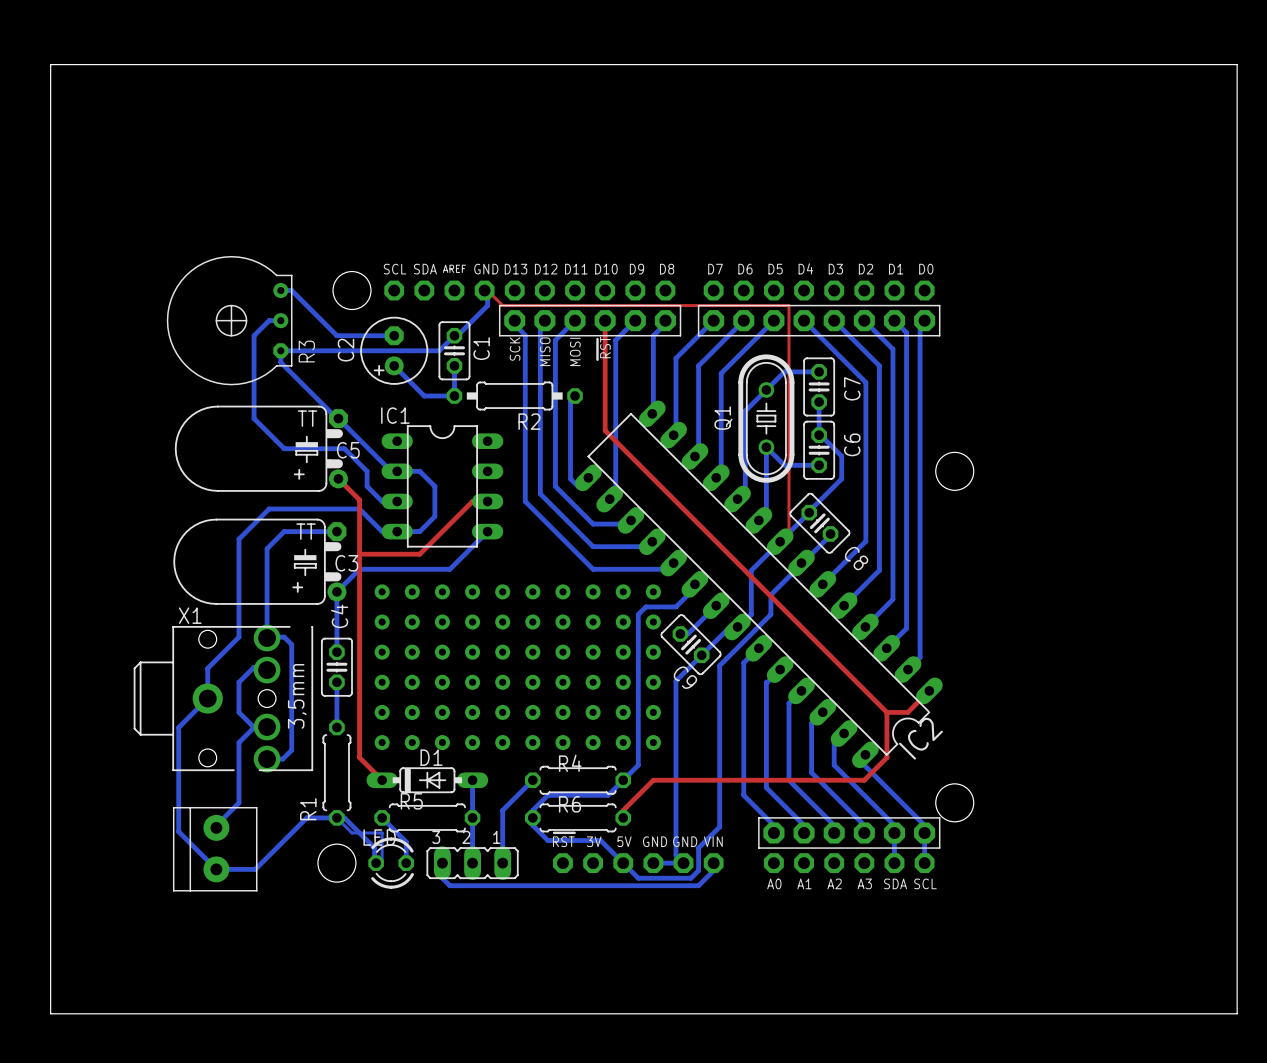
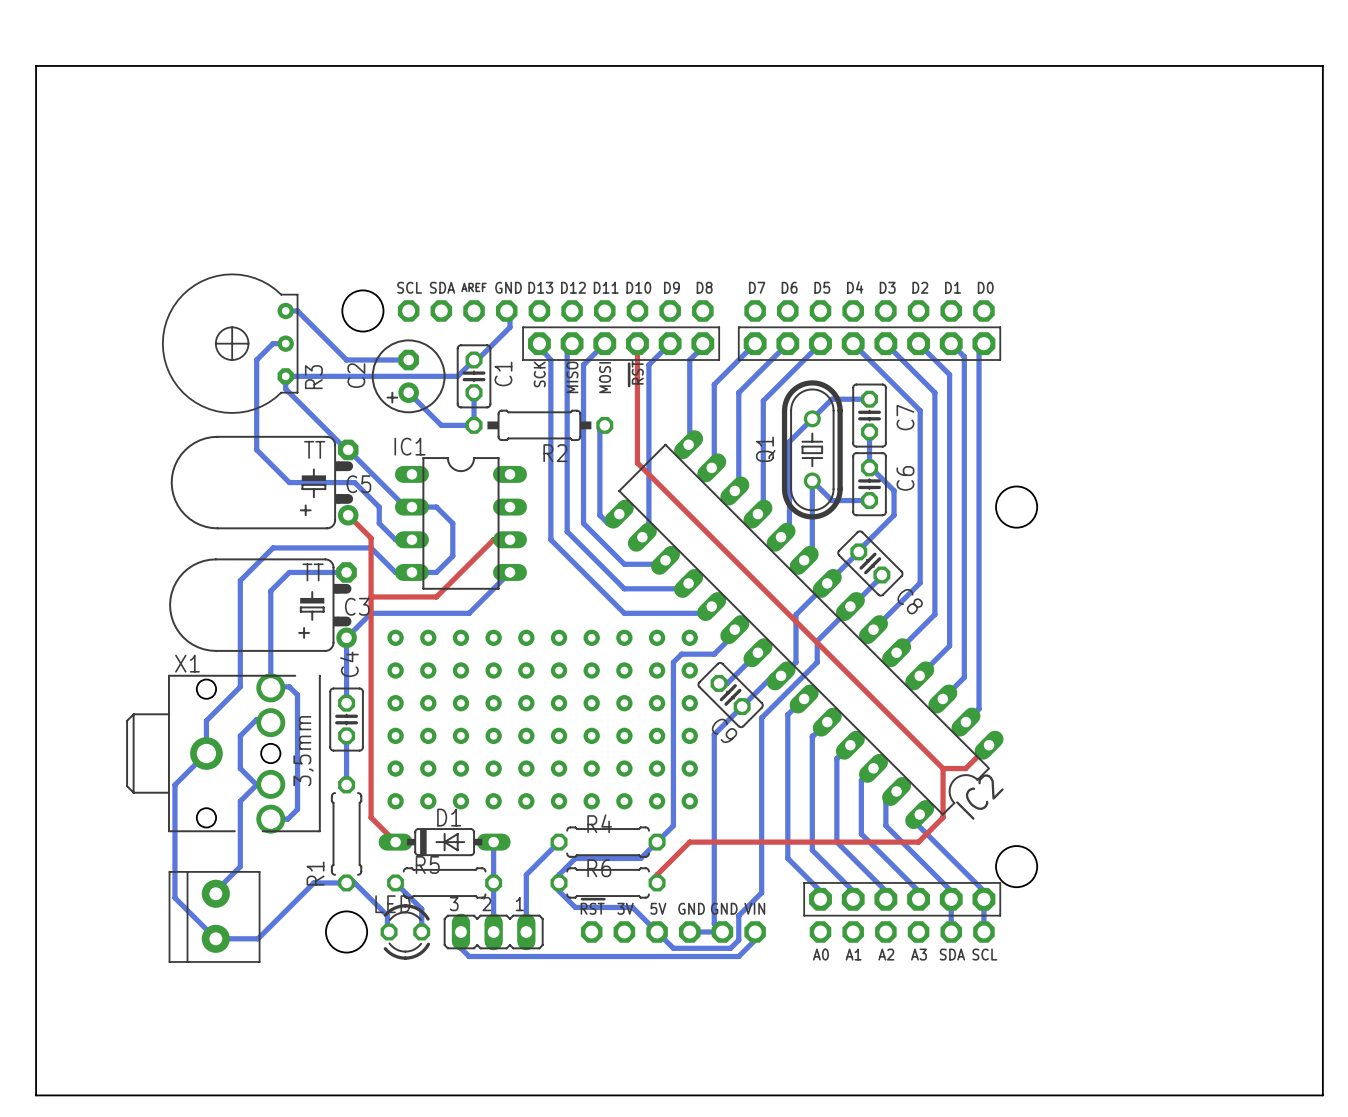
top track: (487, 290) (502, 305) (789, 305) (789, 531) (780, 541) -> none
bottom track: (336, 817) (352, 832) (382, 832) (382, 863) -> none

